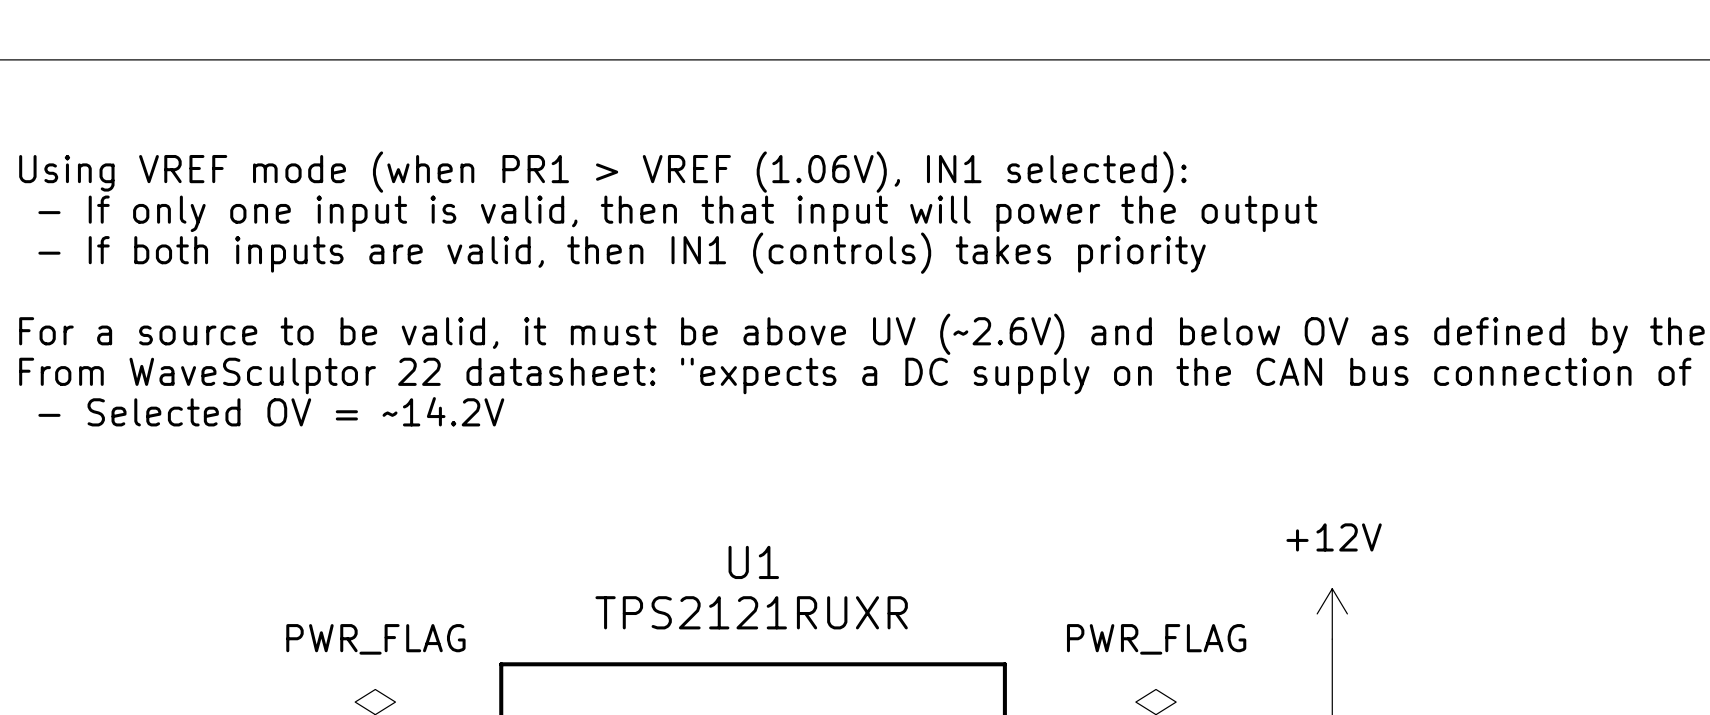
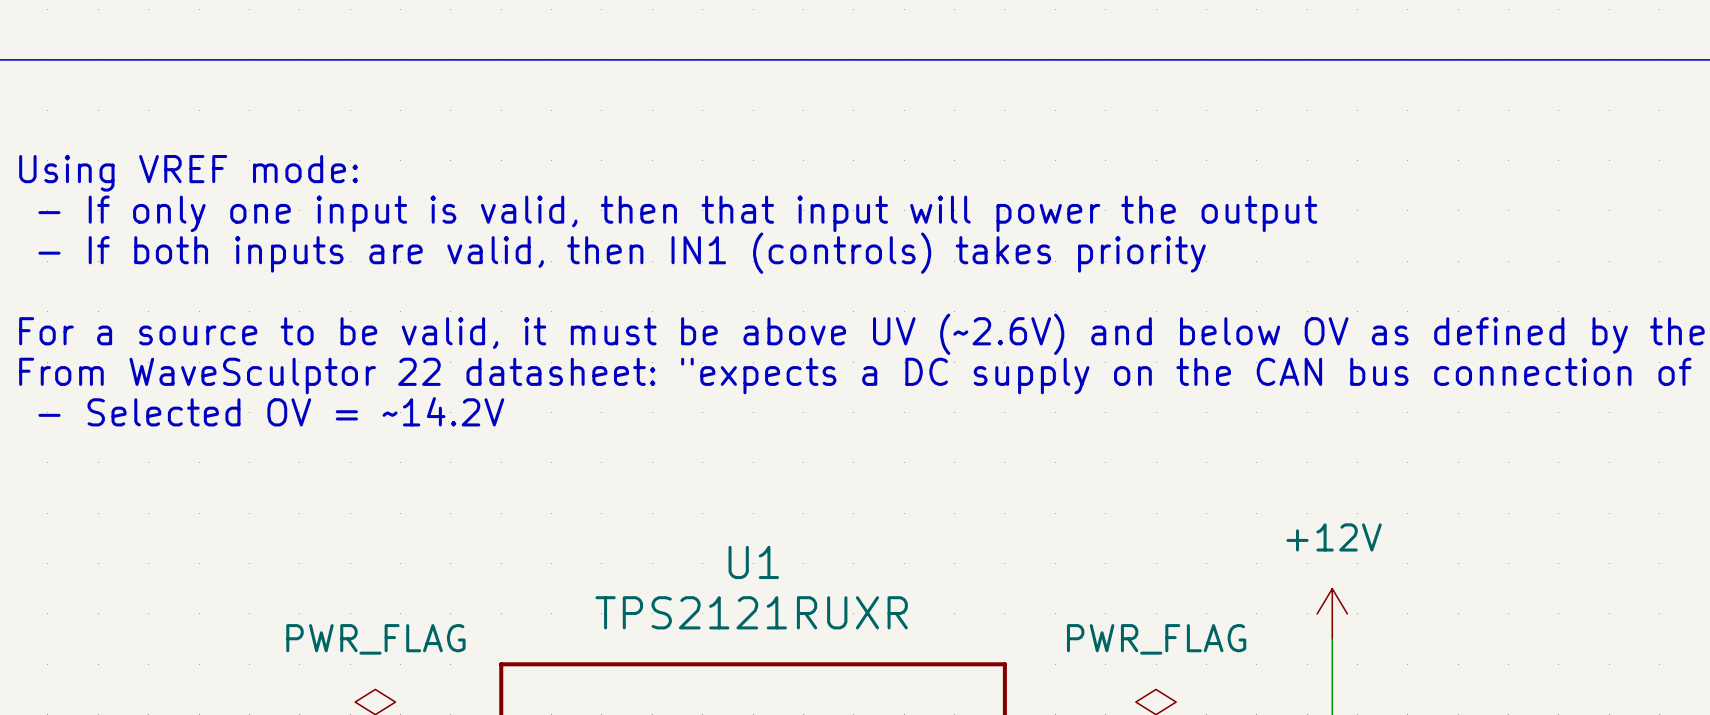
text: Using VREF mode (when PR1 > VREF (1.06V), IN1 selected): (602, 172) -> Using VREF mode: (188, 173)

